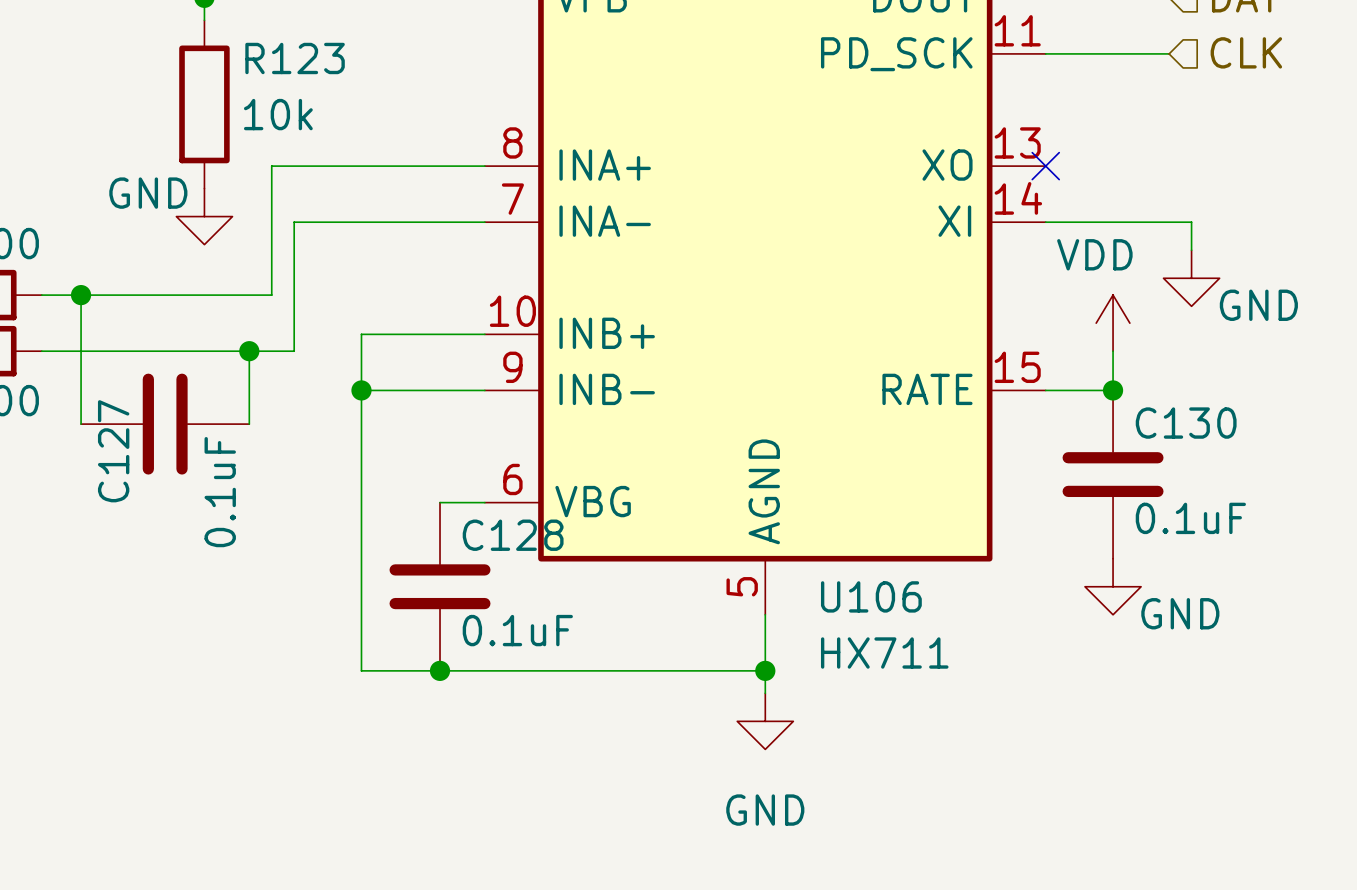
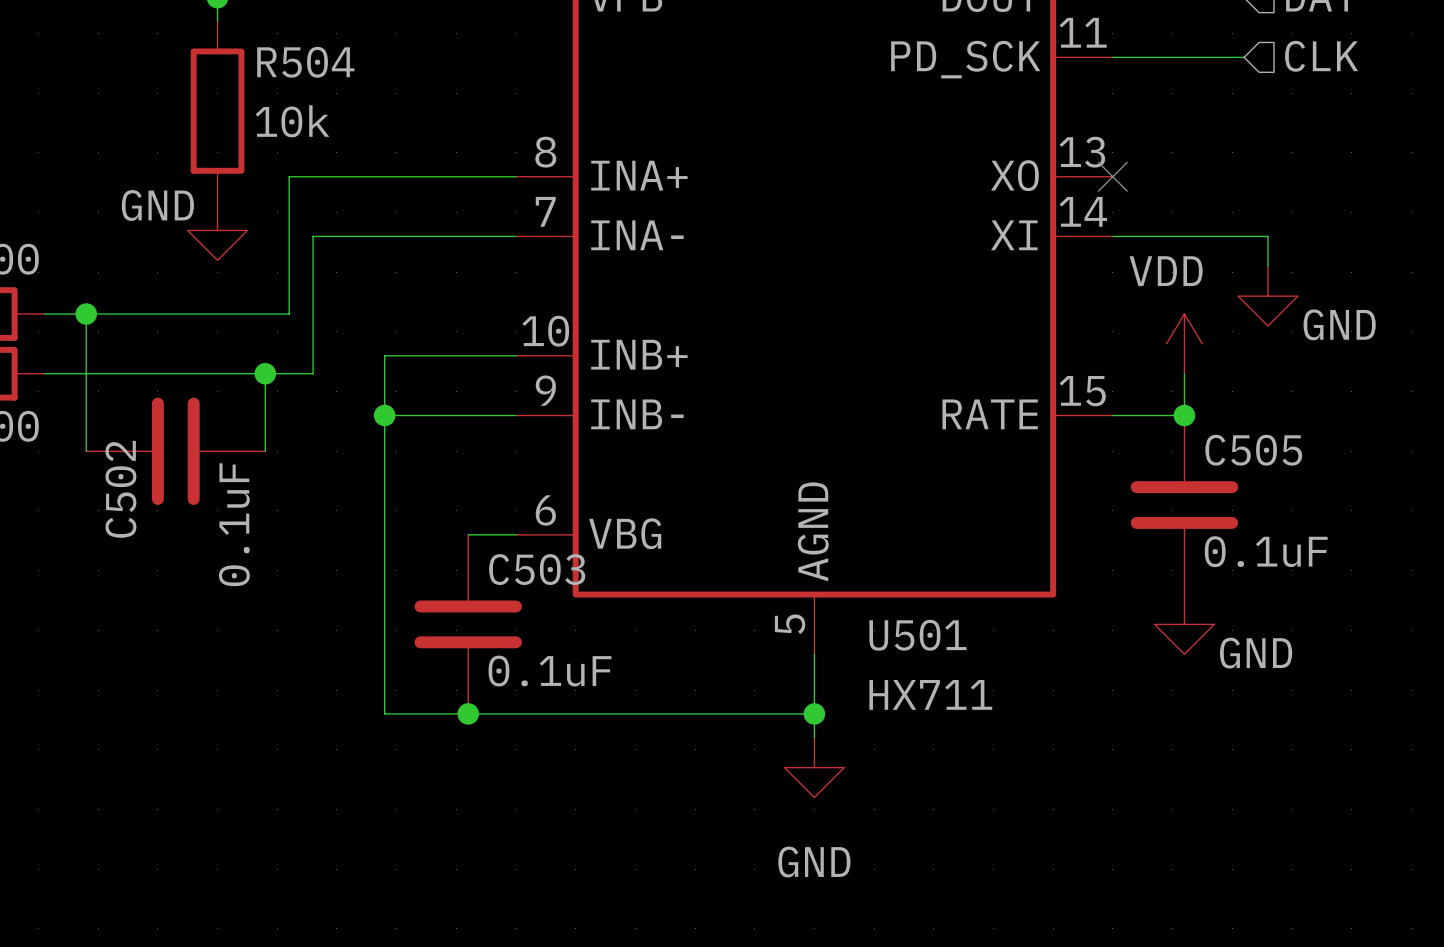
R123 name: R123 (295, 58) -> R504 (305, 62)
C130 name: C130 (1186, 423) -> C505 (1253, 450)
C127 name: C127 (113, 451) -> C502 (120, 489)
C128 name: C128 (513, 535) -> C503 (537, 569)
U106 name: U106 (871, 596) -> U501 (917, 635)

